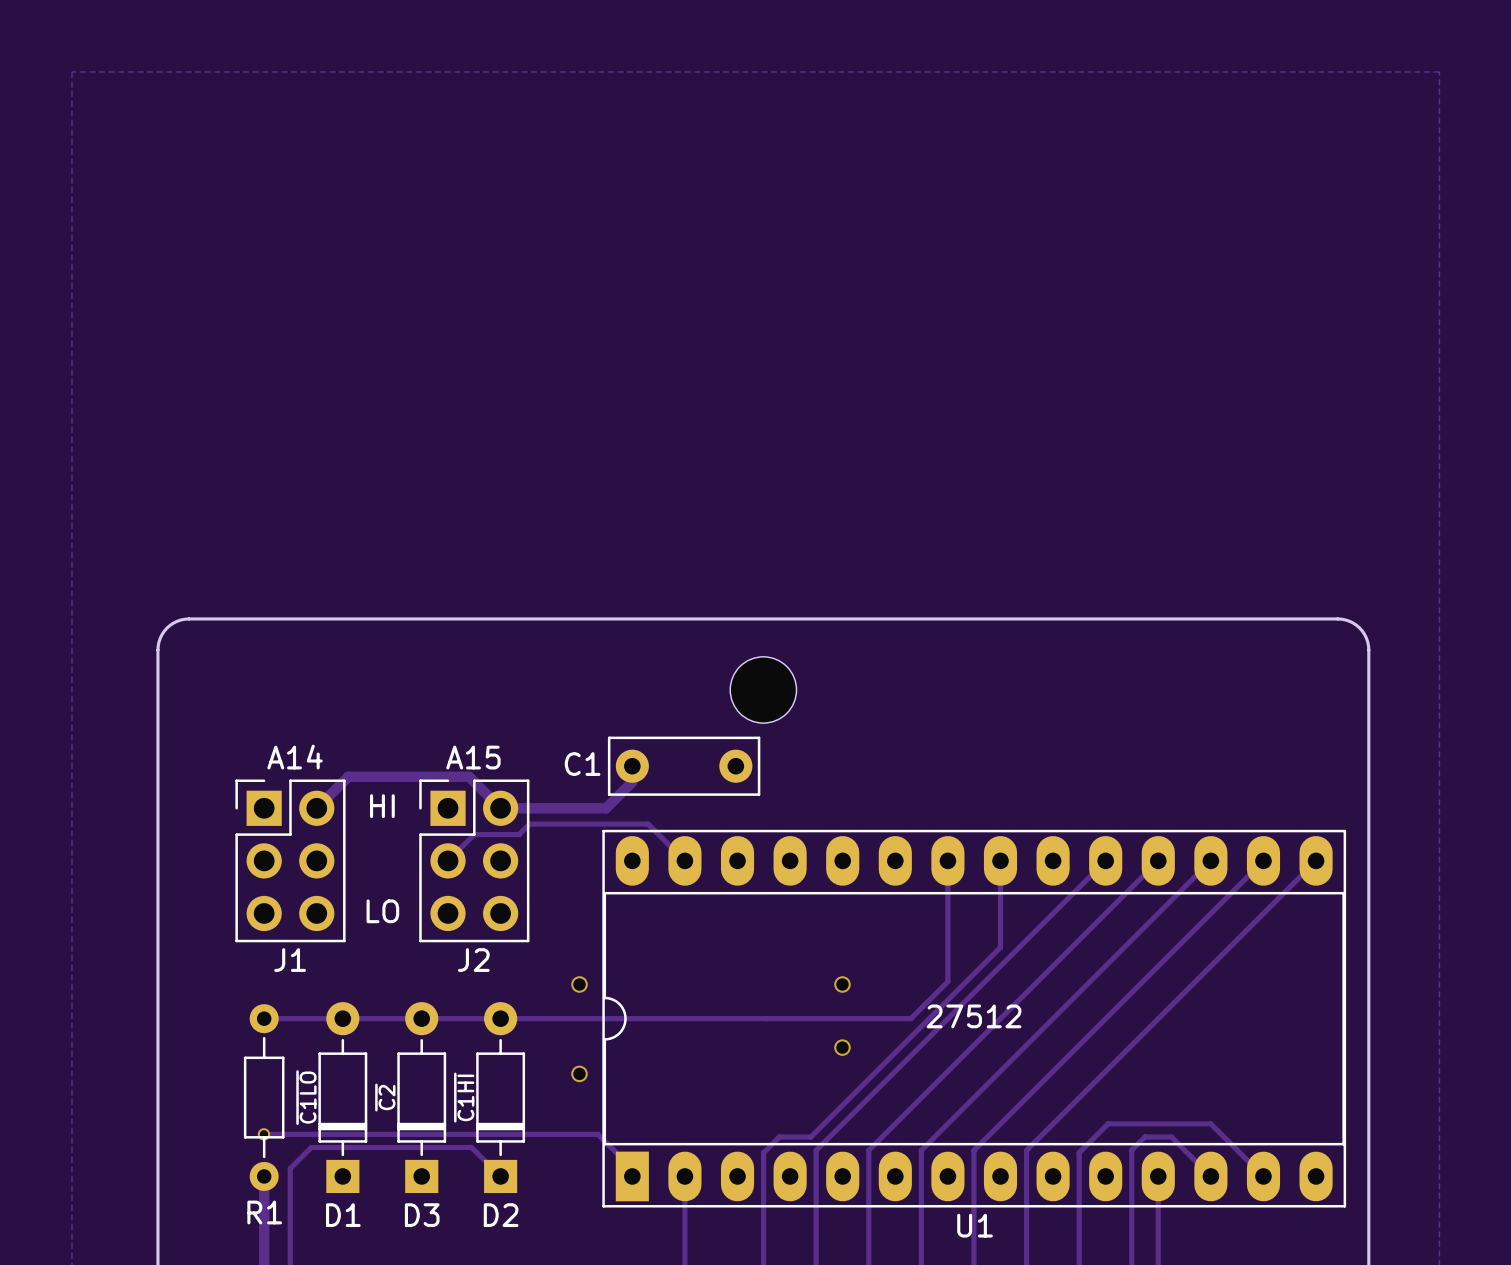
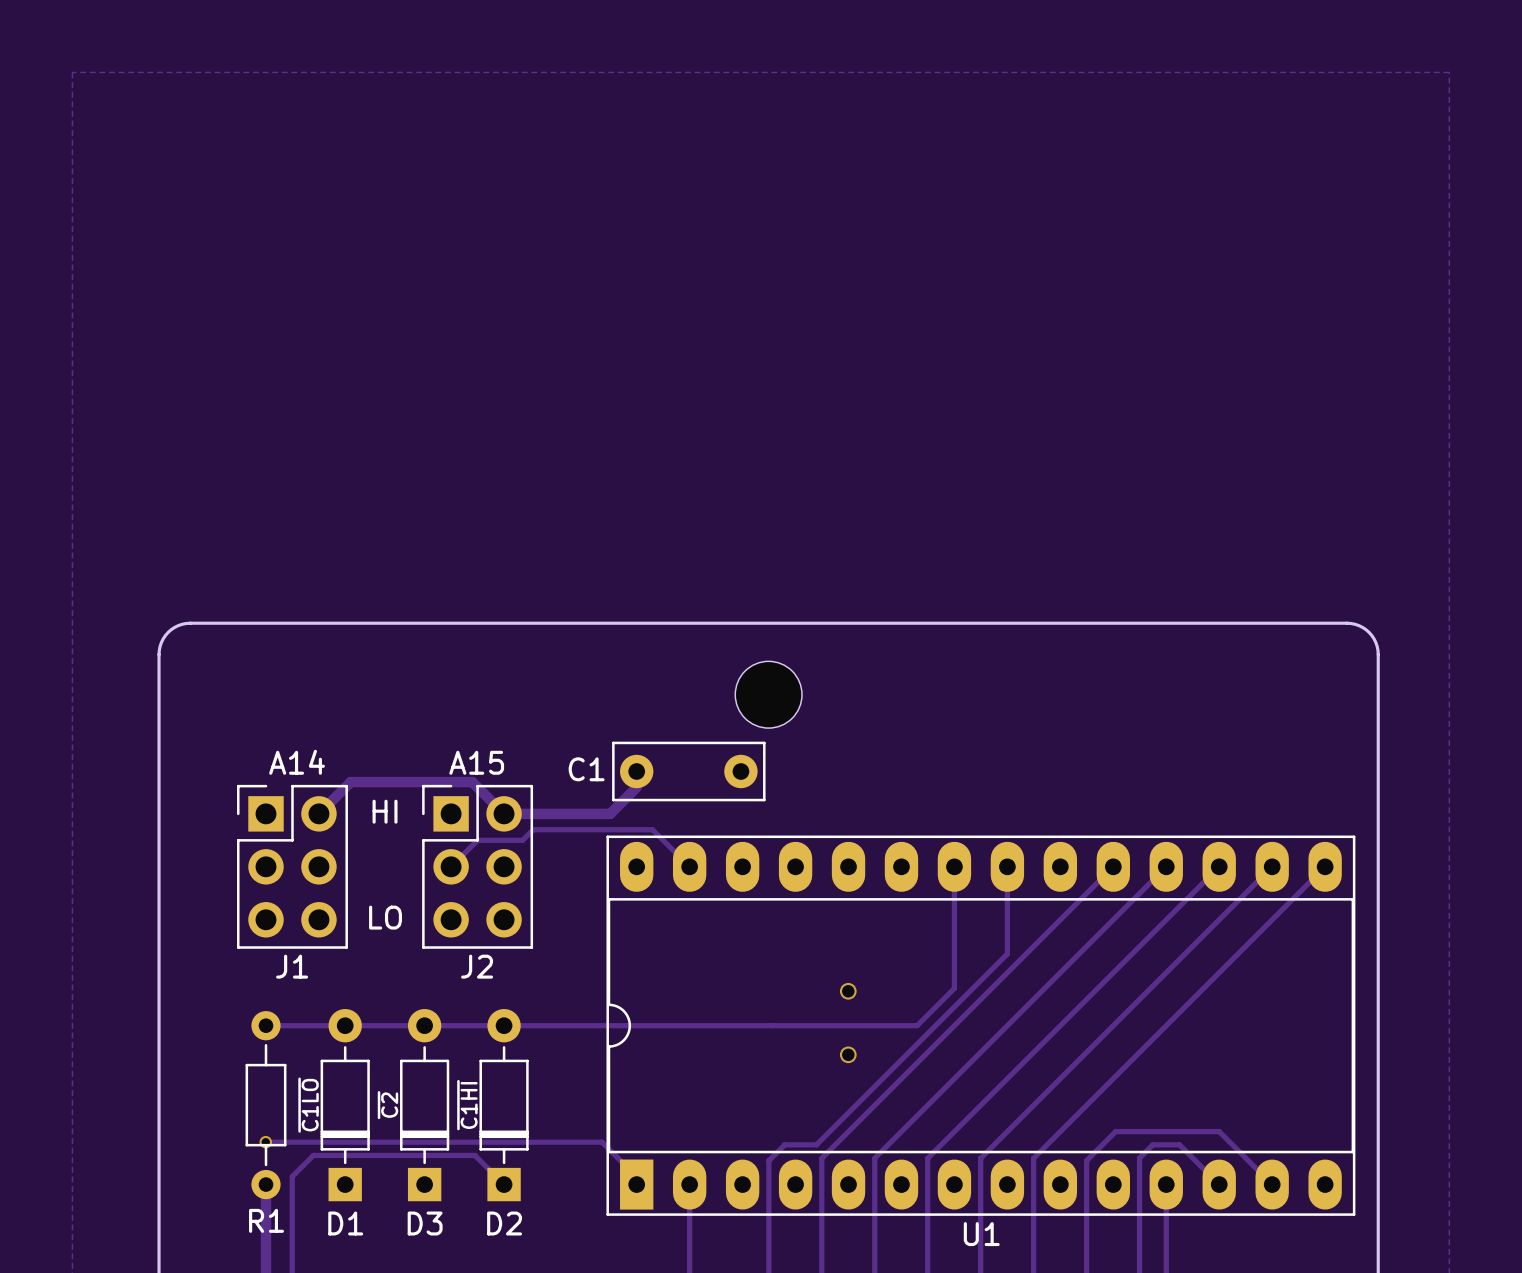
via: (579, 984) -> none
U1 value: 27512 (974, 1016) -> none
via: (579, 1073) -> none

